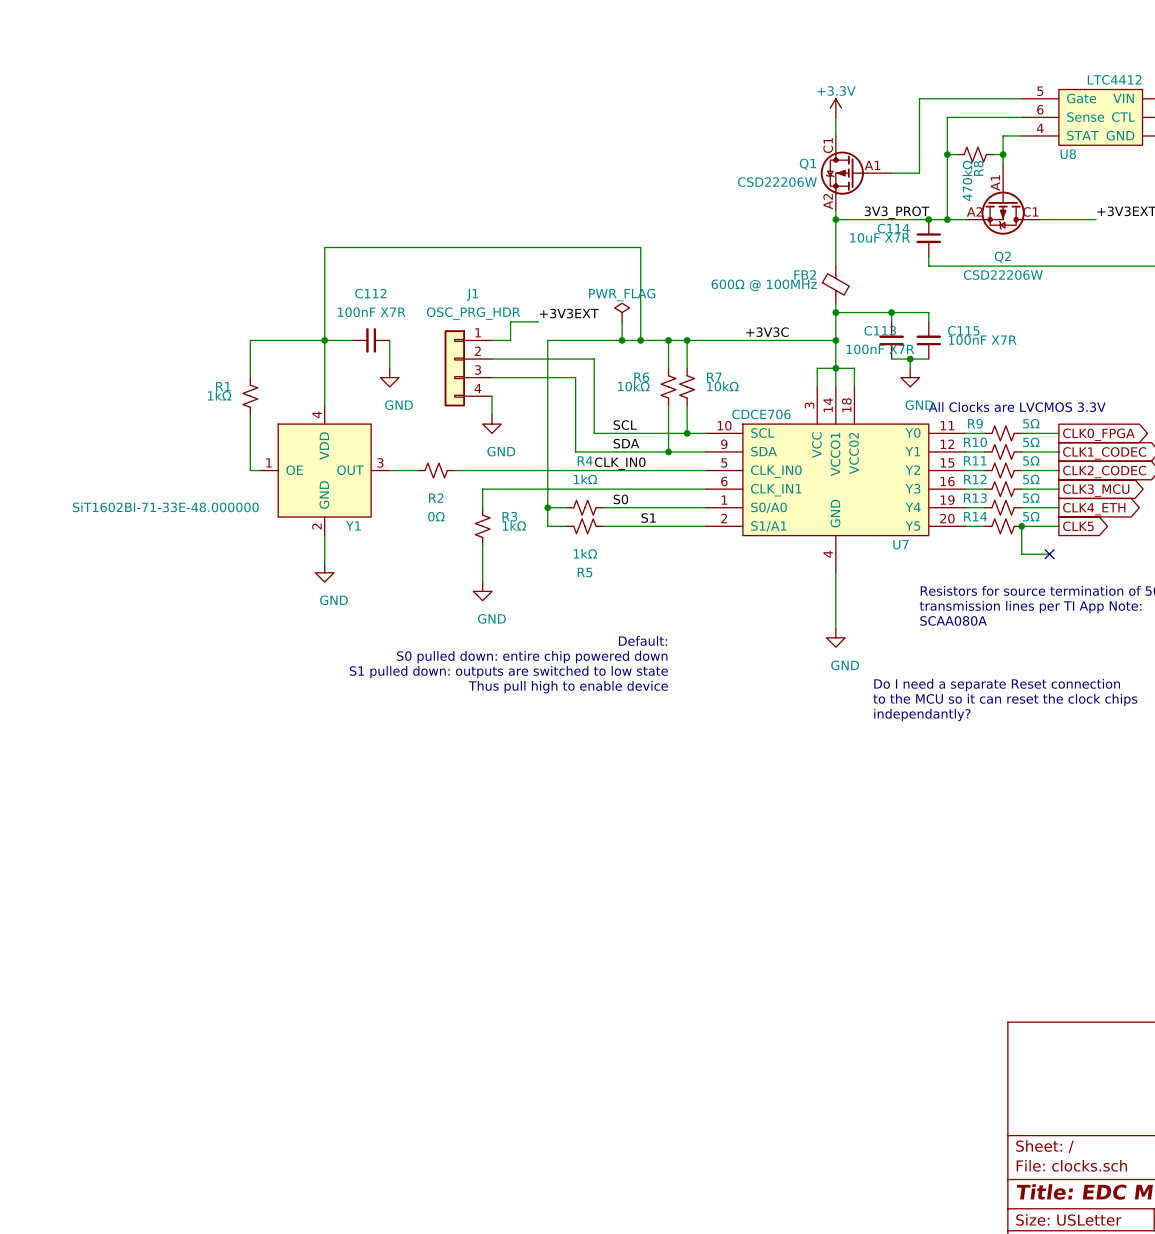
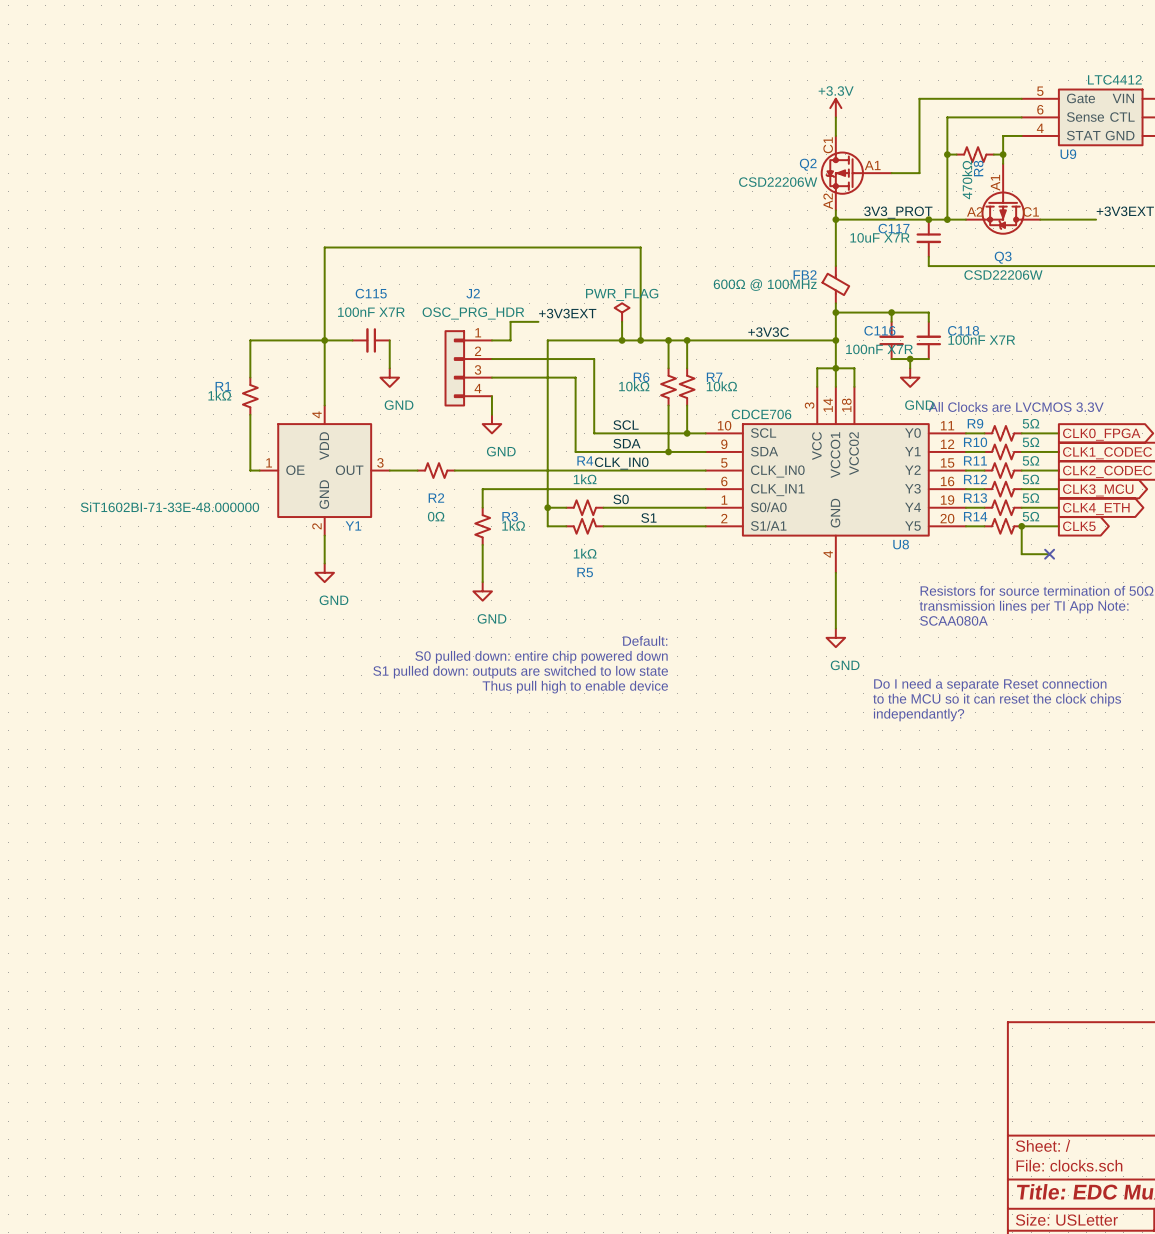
U8 name: U8 (1068, 154) -> U9 (1068, 154)
Q1 name: Q1 (807, 164) -> Q2 (808, 164)
C114 name: C114 (893, 228) -> C117 (894, 228)
Q2 name: Q2 (1002, 257) -> Q3 (1003, 257)
C112 name: C112 (370, 293) -> C115 (371, 293)
J1 name: J1 (472, 294) -> J2 (473, 293)
C113 name: C113 (880, 330) -> C116 (879, 330)
C115 name: C115 (963, 330) -> C118 (963, 330)
U7 name: U7 (900, 544) -> U8 (901, 544)

